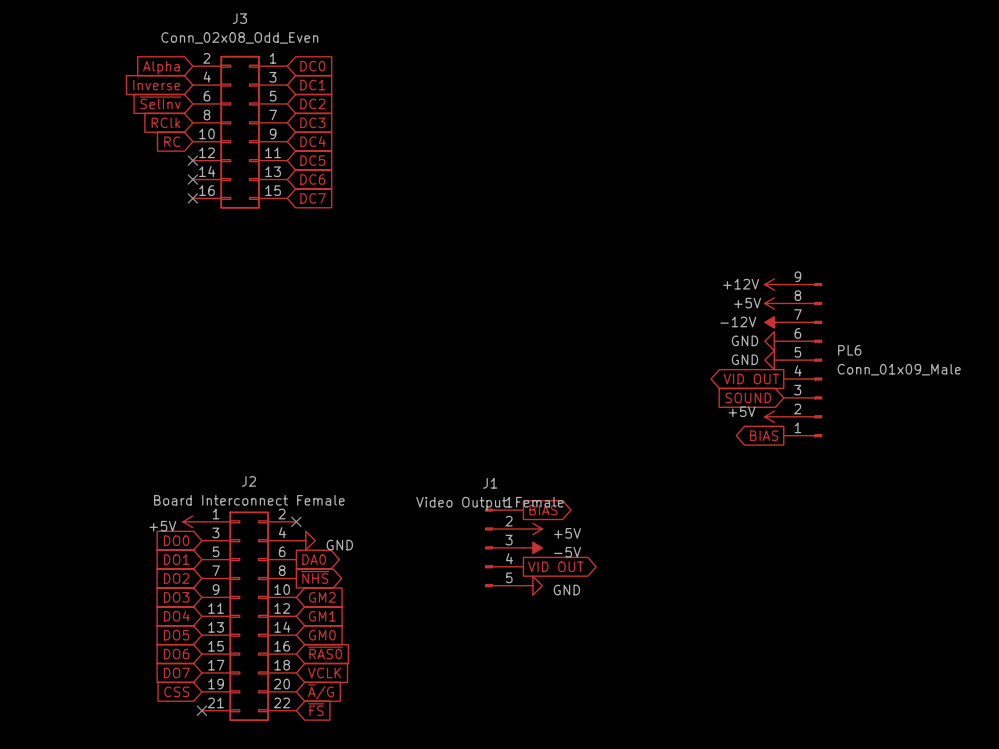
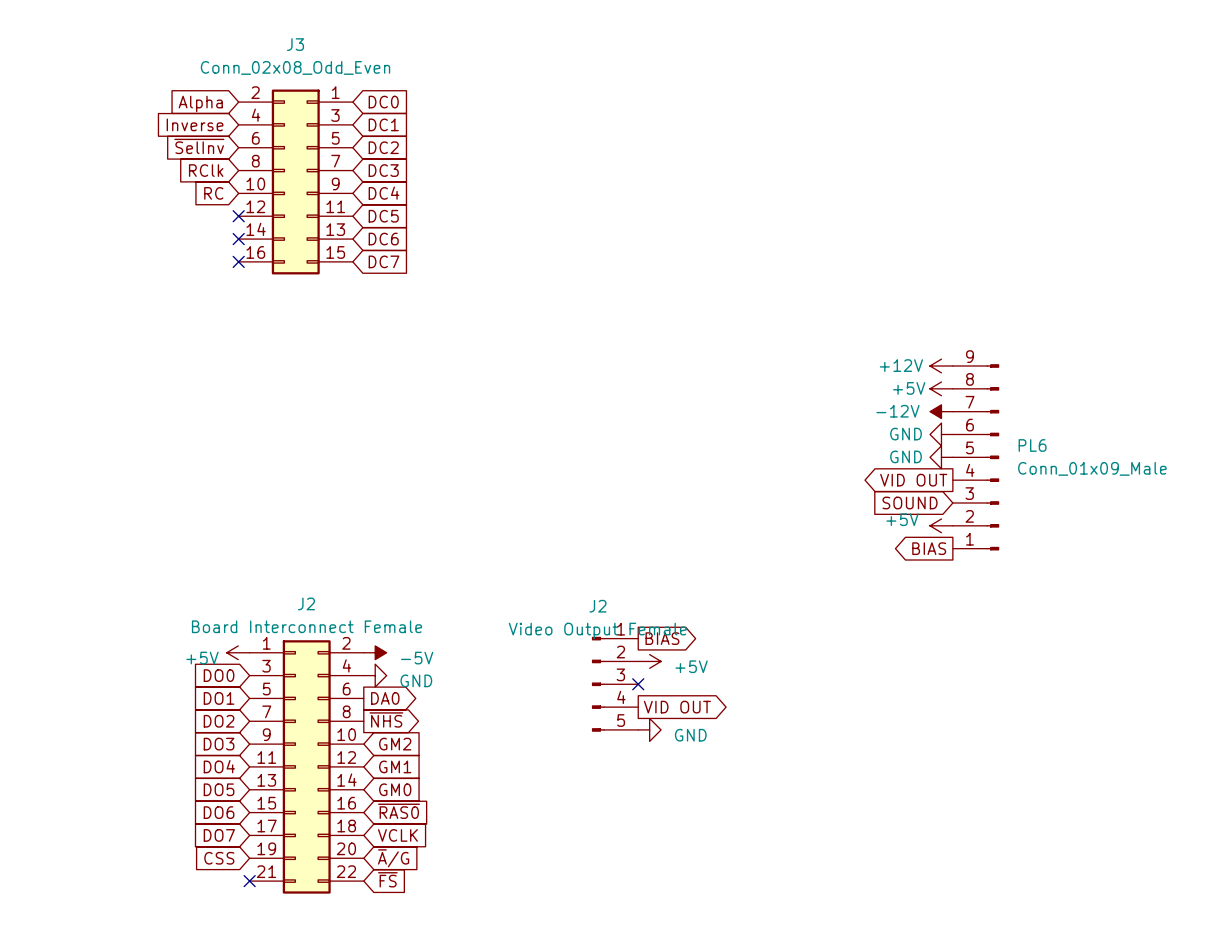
J1 name: J1 (490, 483) -> J2 (598, 606)
no-connect mark: (296, 521) -> none
power symbol: none -> -5V (375, 652)
no-connect mark: none -> (638, 684)
power symbol: -5V (532, 547) -> none

